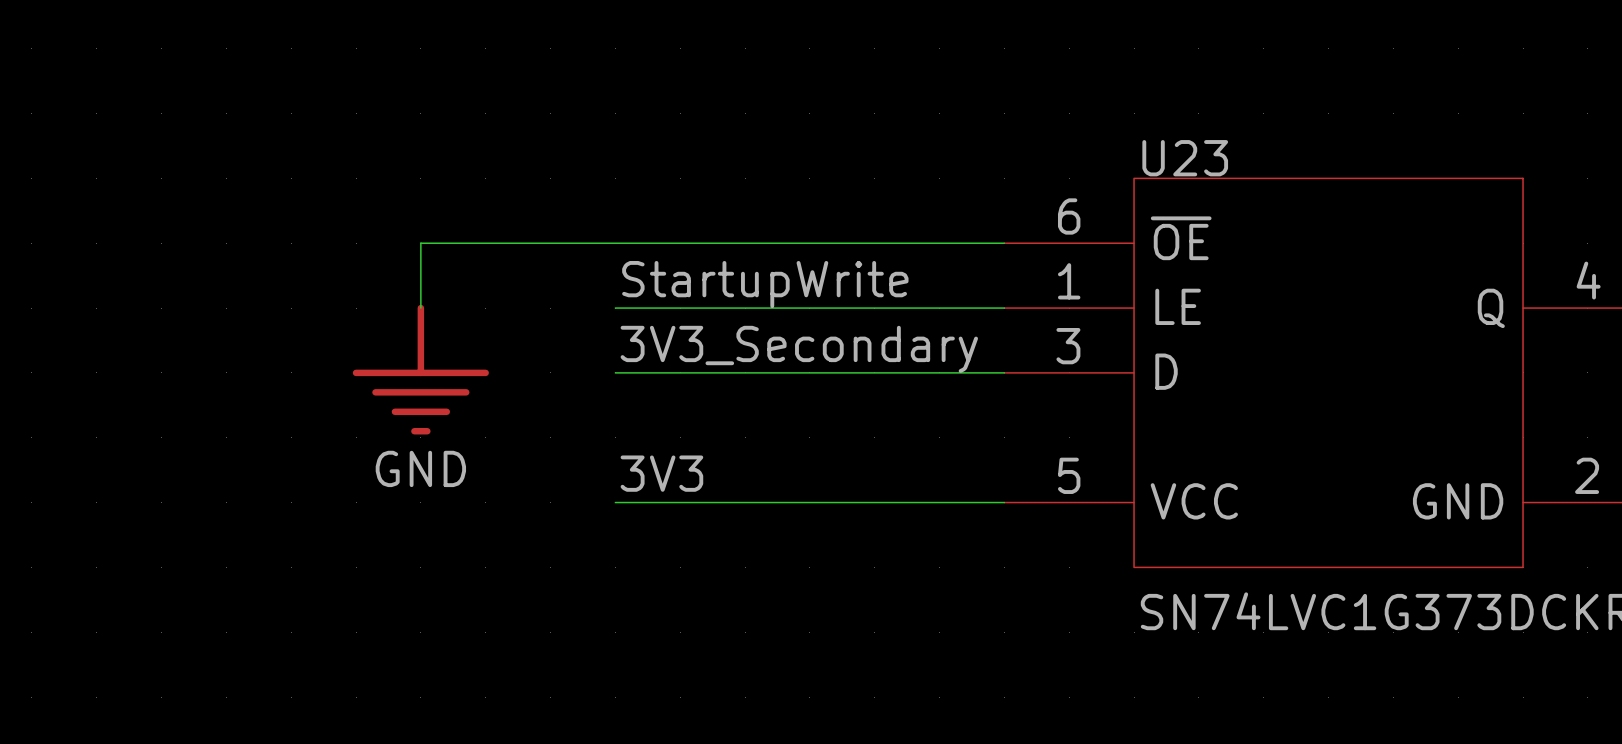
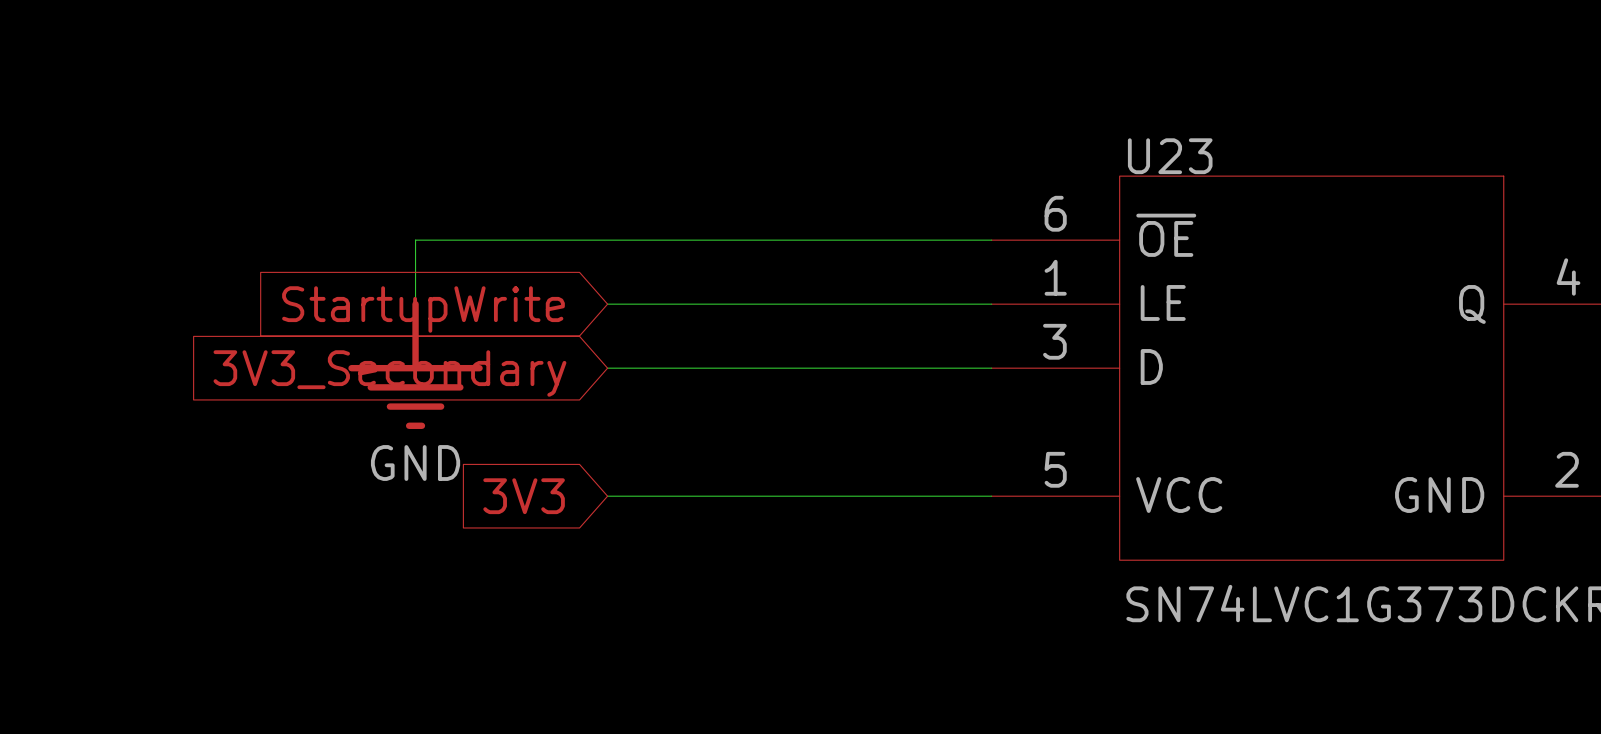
label: StartupWrite (765, 284) -> none
global label: none -> StartupWrite (423, 309)
label: 3V3_Secondary (799, 349) -> none
global label: none -> 3V3_Secondary (389, 373)
label: 3V3 (661, 473) -> none
global label: none -> 3V3 (524, 496)

